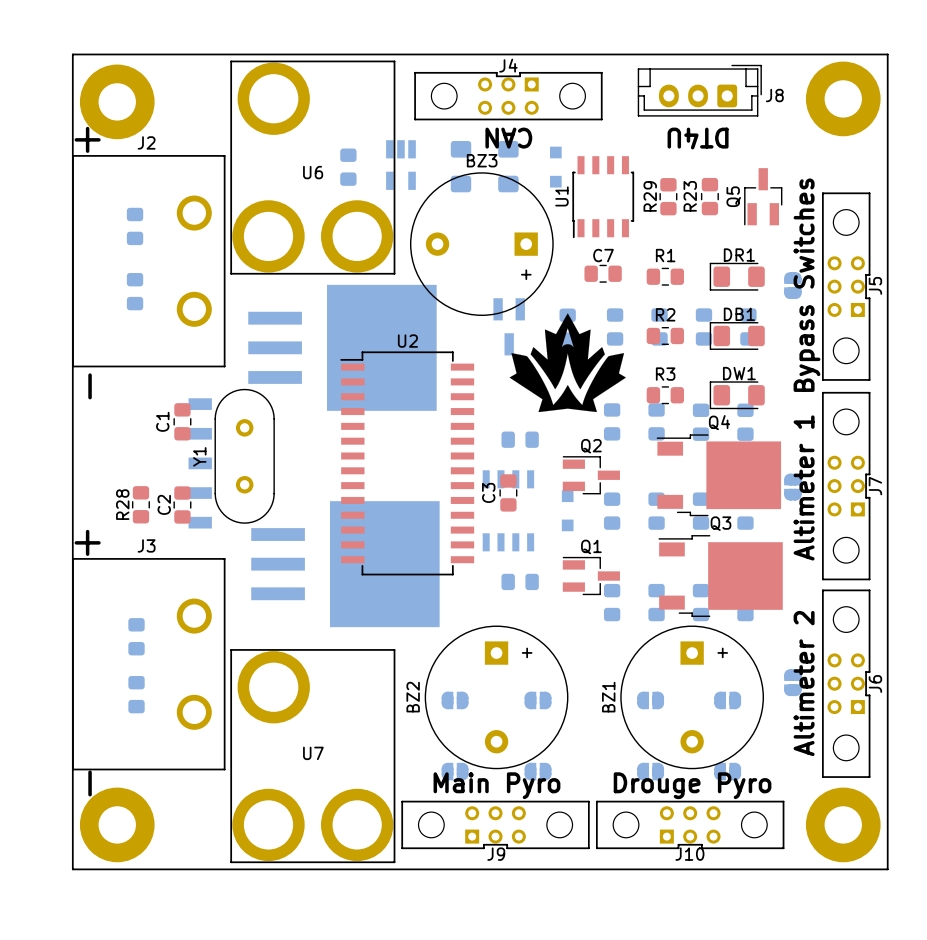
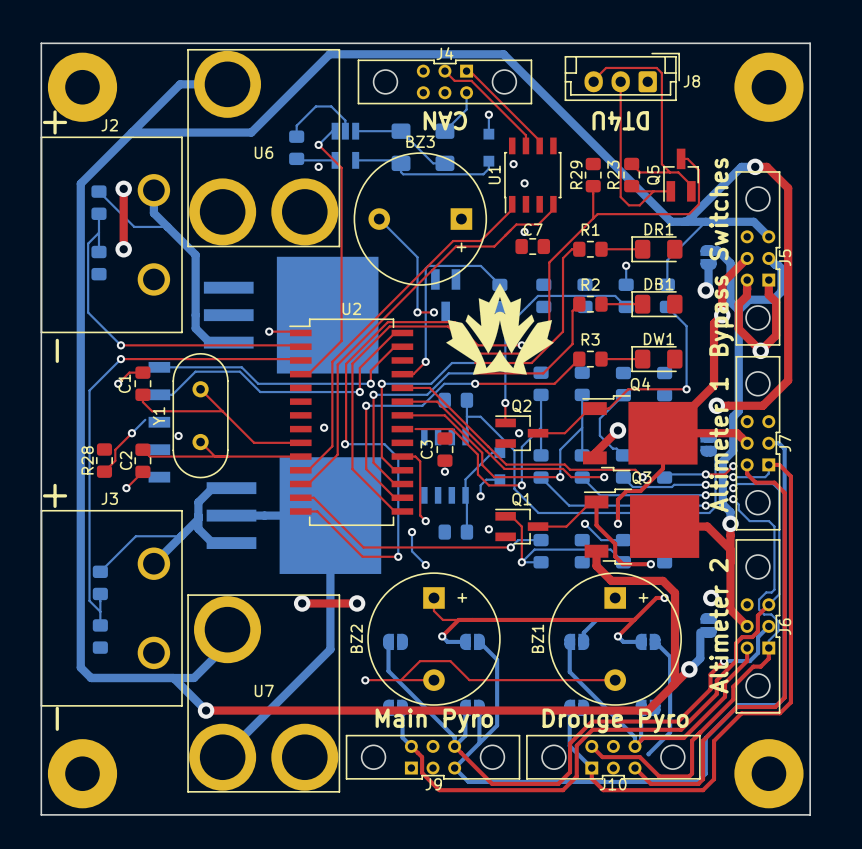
board edge: (887, 54) (887, 869) (72, 869) -> (796, 43) (810, 43) (810, 814) (41, 814) (41, 798)
top track: none -> (444, 71) (454, 80) (471, 80) (525, 135) (525, 145)
top track: none -> (466, 71) (470, 71) (539, 140) (539, 145)
top track: none -> (593, 81) (606, 67) (656, 67) (661, 73) (661, 164) (670, 172)
top track: none -> (620, 81) (620, 197) (628, 205) (639, 205) (653, 191)
bottom track: none -> (227, 84) (180, 84) (80, 183) (80, 667) (91, 677) (194, 677) (227, 644)
part position: (843, 98) -> (768, 87)
bottom track: none -> (466, 92) (466, 109) (444, 131)
bottom track: none -> (488, 114) (488, 134)
via: none -> (488, 114)
bottom track: none -> (335, 131) (332, 131) (318, 144)
bottom track: none -> (345, 131) (345, 120) (331, 106) (315, 106) (296, 125) (296, 136)
bottom track: none -> (355, 131) (401, 131) (433, 163) (444, 163)
bottom track: none -> (131, 132) (251, 132) (329, 54) (503, 54) (671, 221) (753, 221) (768, 236)
top track: none -> (318, 144) (341, 167) (341, 340) (308, 374) (300, 374)
via: none -> (318, 144)
bottom track: none -> (296, 158) (335, 160)
top track: none -> (681, 158) (687, 158) (698, 170) (698, 204) (689, 214) (597, 214) (549, 262) (549, 328) (524, 353) (475, 353) (448, 326) (389, 326) (352, 363) (352, 469) (394, 511) (402, 511)
bottom track: none -> (355, 160) (398, 160) (401, 163) (401, 172) (403, 174) (483, 174) (488, 168) (488, 161)
via: none -> (513, 164)
top track: none -> (631, 163) (640, 172) (678, 172) (691, 185) (691, 191)
via: none -> (318, 166)
top track: none -> (755, 166) (766, 166) (788, 188) (788, 380) (762, 405) (716, 405)
bottom track: none -> (755, 166) (741, 166) (686, 221)
via: none -> (755, 166)
via: none -> (524, 183)
top track: none -> (593, 186) (593, 218)
top track: none -> (631, 186) (636, 191) (670, 191)
top track: none -> (123, 188) (123, 249)
via: none -> (123, 188)
bottom track: none -> (153, 190) (153, 213) (195, 254) (195, 328) (209, 342) (228, 342)
bottom track: none -> (98, 191) (134, 226) (167, 226)
top track: none -> (512, 204) (512, 209) (480, 241) (453, 241) (332, 361) (332, 446) (308, 470) (300, 470)
top track: none -> (553, 204) (553, 209) (538, 224) (516, 224) (494, 246) (455, 246) (337, 364) (337, 454) (308, 484) (300, 484)
bottom track: none -> (98, 213) (98, 252)
bottom track: none -> (379, 219) (417, 257) (417, 312)
bottom track: none -> (705, 221) (667, 260) (667, 284)
bottom track: none -> (98, 232) (88, 243) (88, 312) (120, 345)
via: none -> (524, 231)
via: none -> (123, 249)
top track: none -> (579, 249) (572, 249) (563, 258) (563, 331) (531, 363) (475, 363)
top track: none -> (601, 249) (642, 249)
bottom track: none -> (708, 250) (717, 250) (730, 263) (730, 301) (738, 310)
top track: none -> (747, 258) (722, 283) (722, 315) (714, 323) (714, 385) (666, 433)
bottom track: none -> (768, 258) (781, 268) (781, 291) (773, 299) (749, 299) (738, 310)
bottom track: none -> (708, 264) (708, 287) (705, 290)
bottom track: none -> (626, 265) (626, 284)
via: none -> (626, 265)
top track: none -> (747, 280) (746, 295) (738, 304) (738, 328) (760, 350) (776, 335) (776, 302) (768, 294) (768, 280)
bottom track: none -> (499, 284) (480, 265) (428, 265) (425, 268) (425, 361)
via: none -> (705, 290)
top track: none -> (579, 304) (572, 310) (572, 344) (543, 373) (475, 373)
top track: none -> (601, 304) (642, 304)
bottom track: none -> (626, 306) (615, 295) (537, 295) (505, 328) (505, 403)
bottom track: none -> (667, 306) (686, 326) (686, 389)
bottom track: none -> (738, 310) (738, 411) (733, 416) (733, 450) (722, 461) (722, 504) (730, 512) (730, 523)
top track: none -> (417, 312) (433, 312)
via: none -> (417, 312)
via: none -> (433, 312)
via: none -> (722, 315)
top track: none -> (269, 331) (300, 333)
via: none -> (269, 331)
top track: none -> (402, 333) (394, 333) (359, 368) (359, 392)
top track: none -> (120, 345) (300, 346)
via: none -> (120, 345)
top track: none -> (521, 345) (477, 345) (454, 322) (387, 322) (346, 363) (345, 444)
via: none -> (521, 345)
top track: none -> (402, 346) (394, 346) (370, 370) (370, 383)
via: none -> (760, 350)
top track: none -> (120, 359) (300, 360)
bottom track: none -> (120, 359) (89, 390) (89, 600) (100, 611)
via: none -> (120, 359)
top track: none -> (579, 359) (554, 383) (475, 383)
top track: none -> (601, 359) (642, 359)
top track: none -> (425, 361) (413, 374) (402, 374)
via: none -> (425, 361)
bottom track: none -> (475, 363) (452, 363) (431, 383) (381, 383)
bottom track: none -> (159, 367) (241, 367) (258, 383) (370, 383)
top track: none -> (142, 372) (129, 372) (118, 383)
bottom track: none -> (475, 373) (448, 373) (427, 394) (373, 394)
via: none -> (118, 383)
via: none -> (370, 383)
top track: none -> (381, 383) (381, 457) (394, 470) (402, 470)
via: none -> (381, 383)
bottom track: none -> (475, 383) (444, 383) (422, 405) (366, 405)
via: none -> (475, 383)
top track: none -> (402, 387) (429, 387) (506, 464) (564, 464) (570, 469) (635, 469) (642, 477)
top track: none -> (200, 389) (254, 442) (300, 442)
top track: none -> (686, 389) (628, 389) (608, 408) (589, 408) (564, 433) (538, 433)
via: none -> (686, 389)
bottom track: none -> (359, 392) (260, 392) (239, 371) (195, 371) (172, 394) (159, 394)
via: none -> (359, 392)
top track: none -> (142, 394) (142, 402) (152, 411) (222, 411)
top track: none -> (373, 394) (373, 462) (394, 484) (402, 484)
via: none -> (373, 394)
bottom track: none -> (541, 394) (541, 455)
bottom track: none -> (582, 394) (582, 455)
bottom track: none -> (623, 395) (599, 418) (599, 435) (612, 448) (616, 448) (623, 455)
bottom track: none -> (466, 400) (465, 436)
top track: none -> (402, 401) (437, 401) (504, 468) (563, 468) (571, 477) (604, 477)
top track: none -> (505, 403) (505, 422)
via: none -> (505, 403)
top track: none -> (366, 405) (366, 469) (394, 497) (402, 497)
via: none -> (366, 405)
via: none -> (716, 405)
top track: none -> (402, 415) (444, 415) (482, 452) (482, 465) (494, 477) (560, 477)
bottom track: none -> (466, 416) (480, 416) (514, 450) (514, 488) (538, 512) (709, 512) (715, 506) (716, 435)
bottom track: none -> (145, 419) (131, 433)
via: none -> (324, 427)
bottom track: none -> (541, 427) (521, 446) (521, 485)
bottom track: none -> (582, 427) (560, 449) (560, 477)
top track: none -> (415, 429) (452, 429) (477, 454) (477, 474) (488, 485) (521, 485)
top track: none -> (617, 430) (594, 453) (594, 457)
via: none -> (617, 430)
top track: none -> (131, 433) (115, 449) (115, 460) (104, 471)
via: none -> (131, 433)
via: none -> (519, 433)
via: none -> (178, 435)
top track: none -> (200, 442) (215, 456)
top track: none -> (747, 443) (737, 433) (662, 433) (662, 468) (640, 491) (626, 491) (617, 499) (617, 523)
bottom track: none -> (768, 443) (778, 443) (784, 448) (784, 697) (777, 705) (738, 705) (705, 738) (705, 773) (697, 781) (468, 781) (454, 768) (497, 725) (497, 659) (479, 641)
bottom track: none -> (345, 444) (384, 444) (398, 457) (398, 556)
via: none -> (345, 444)
top track: none -> (142, 449) (149, 456) (300, 456)
bottom track: none -> (499, 452) (492, 452) (465, 479) (466, 537)
top track: none -> (402, 456) (415, 456) (420, 461) (420, 515) (425, 521)
top track: none -> (747, 464) (747, 474) (755, 482) (774, 482) (784, 492) (784, 697) (775, 707) (736, 707) (703, 740) (703, 779) (698, 783) (650, 783) (635, 768)
top track: none -> (768, 464) (779, 464) (790, 476) (790, 702) (779, 713) (741, 713) (714, 740) (714, 779) (703, 790) (603, 790) (591, 778) (591, 768)
bottom track: none -> (768, 464) (768, 473) (765, 477) (733, 477)
top track: none -> (733, 466) (725, 474) (705, 474)
via: none -> (733, 466)
top track: none -> (142, 471) (126, 488)
via: none -> (444, 471)
bottom track: none -> (705, 474) (667, 474) (664, 477)
via: none -> (705, 474)
via: none -> (560, 477)
via: none -> (604, 477)
via: none -> (642, 477)
via: none -> (733, 477)
bottom track: none -> (541, 477) (569, 505) (705, 505)
bottom track: none -> (582, 477) (599, 495) (705, 495)
bottom track: none -> (623, 477) (632, 487) (705, 484)
bottom track: none -> (499, 479) (486, 479) (480, 485) (480, 496)
via: none -> (705, 484)
via: none -> (521, 485)
via: none -> (126, 488)
bottom track: none -> (231, 488) (212, 488) (198, 502) (198, 528) (212, 543) (231, 543)
bottom track: none -> (733, 488) (737, 484) (773, 484) (779, 490) (779, 594) (768, 604)
via: none -> (733, 488)
via: none -> (705, 495)
via: none -> (480, 496)
top track: none -> (300, 497) (313, 497) (363, 547) (510, 547)
bottom track: none -> (733, 499) (738, 504) (738, 510) (749, 521) (768, 521) (774, 526) (774, 589) (771, 592) (766, 592) (759, 599) (759, 609) (764, 614) (771, 614) (778, 621) (778, 631) (768, 640) (768, 648)
via: none -> (733, 499)
via: none -> (705, 505)
top track: none -> (300, 511) (317, 511) (362, 556) (398, 556)
bottom track: none -> (231, 515) (330, 515) (330, 649) (222, 757)
top track: none -> (505, 516) (511, 516) (521, 526) (521, 562)
bottom track: none -> (198, 519) (153, 563)
via: none -> (425, 521)
bottom track: none -> (584, 523) (601, 540) (623, 540)
via: none -> (584, 523)
via: none -> (617, 523)
top track: none -> (730, 523) (730, 609) (747, 626)
via: none -> (730, 523)
top track: none -> (538, 526) (566, 526) (591, 501) (596, 501) (596, 525) (615, 543) (615, 556) (622, 564) (650, 564)
top track: none -> (664, 526) (707, 526) (730, 549)
via: none -> (488, 529)
bottom track: none -> (412, 532) (412, 551) (425, 565)
via: none -> (412, 532)
bottom track: none -> (181, 536) (135, 536) (100, 571)
bottom track: none -> (541, 540) (518, 540) (510, 547)
via: none -> (510, 547)
top track: none -> (596, 551) (596, 565) (611, 580) (662, 580) (675, 592) (675, 683)
via: none -> (398, 556)
via: none -> (521, 562)
bottom track: none -> (541, 562) (521, 562) (534, 549) (610, 549) (623, 562)
via: none -> (650, 564)
via: none -> (425, 565)
bottom track: none -> (100, 593) (100, 625)
top track: none -> (433, 597) (433, 610) (442, 619) (472, 619)
top track: none -> (664, 597) (656, 597) (617, 636)
via: none -> (664, 597)
via: none -> (711, 597)
top track: none -> (302, 603) (357, 603)
via: none -> (302, 603)
via: none -> (357, 603)
top track: none -> (768, 604) (757, 615) (757, 631) (752, 637) (742, 637) (736, 643) (736, 661) (716, 680) (716, 694) (681, 729) (592, 729) (576, 745) (576, 776) (563, 790) (439, 790) (422, 772) (422, 757) (411, 746)
bottom track: none -> (596, 619) (583, 632) (583, 641)
top track: none -> (634, 619) (458, 619) (442, 636)
bottom track: none -> (768, 626) (758, 637) (758, 652) (749, 661) (723, 661)
bottom track: none -> (700, 632) (700, 658) (689, 669)
bottom track: none -> (442, 636) (447, 641) (465, 641)
via: none -> (442, 636)
bottom track: none -> (617, 636) (623, 641) (641, 641)
via: none -> (617, 636)
bottom track: none -> (388, 641) (388, 671) (454, 737) (454, 746) (465, 735) (465, 707)
bottom track: none -> (569, 641) (569, 671) (635, 737) (635, 746) (641, 740) (641, 707)
bottom track: none -> (655, 641) (670, 656) (670, 732) (648, 754)
top track: none -> (747, 648) (747, 660) (725, 683) (725, 696) (683, 738) (643, 738) (635, 746)
top track: none -> (768, 648) (768, 658) (760, 666) (753, 666) (733, 686) (733, 699) (692, 740) (692, 773) (689, 776) (659, 776) (639, 757) (602, 757) (591, 746)
top track: none -> (723, 661) (710, 674) (710, 689) (678, 721) (591, 721) (570, 743) (570, 772) (558, 783) (492, 783) (454, 746)
via: none -> (723, 661)
top track: none -> (689, 669) (648, 710) (206, 710)
via: none -> (689, 669)
bottom track: none -> (173, 677) (206, 710)
via: none -> (365, 680)
top track: none -> (401, 680) (420, 661) (450, 661) (469, 680) (615, 680)
top track: none -> (433, 680) (365, 680)
bottom track: none -> (402, 707) (402, 737) (411, 746)
bottom track: none -> (479, 707) (479, 743)
bottom track: none -> (569, 707) (569, 745) (591, 768)
via: none -> (206, 710)
part position: (117, 824) -> (82, 773)
part position: (843, 824) -> (768, 773)

